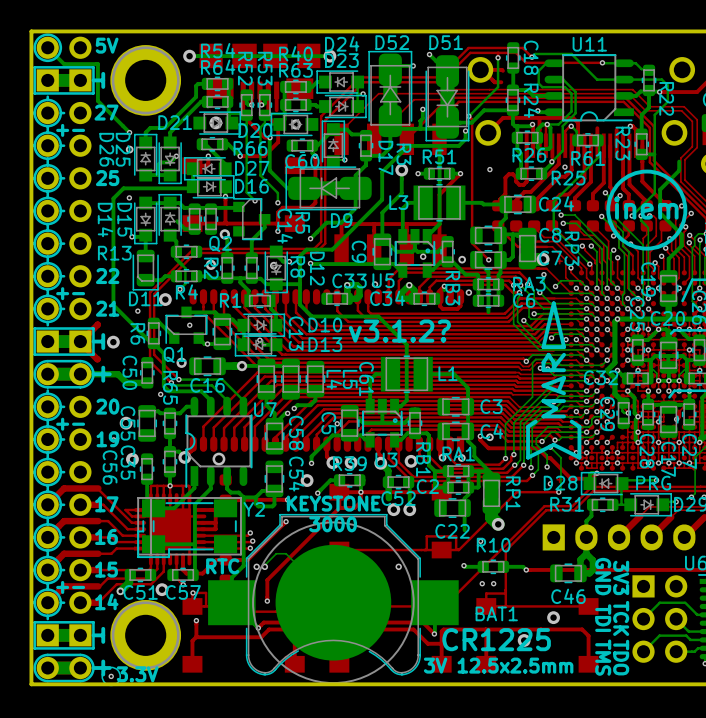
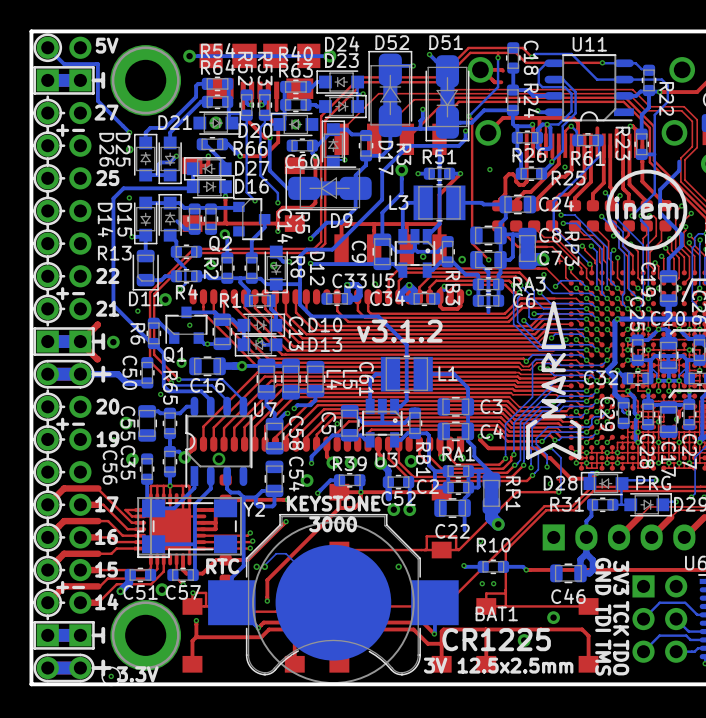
text: v3.1.2? (399, 331) -> v3.1.2 (399, 331)

